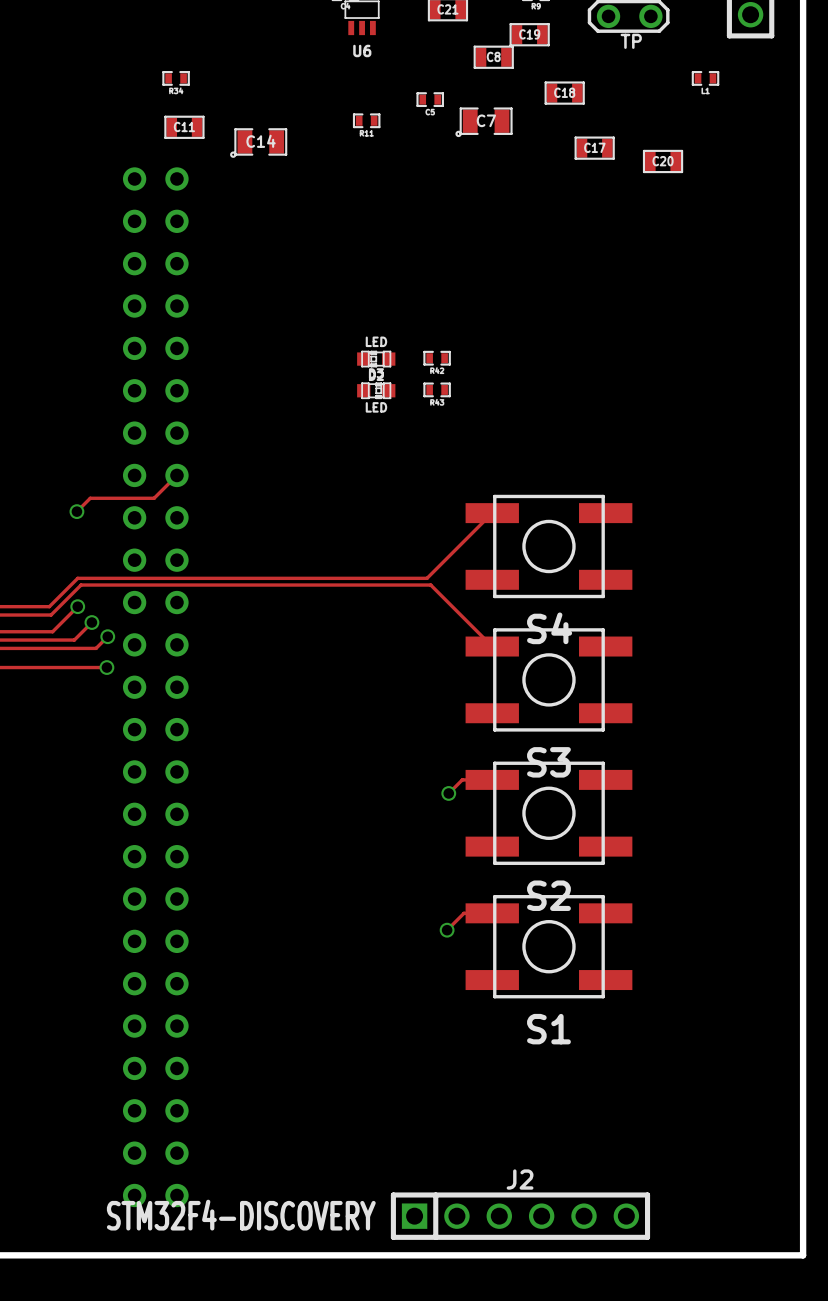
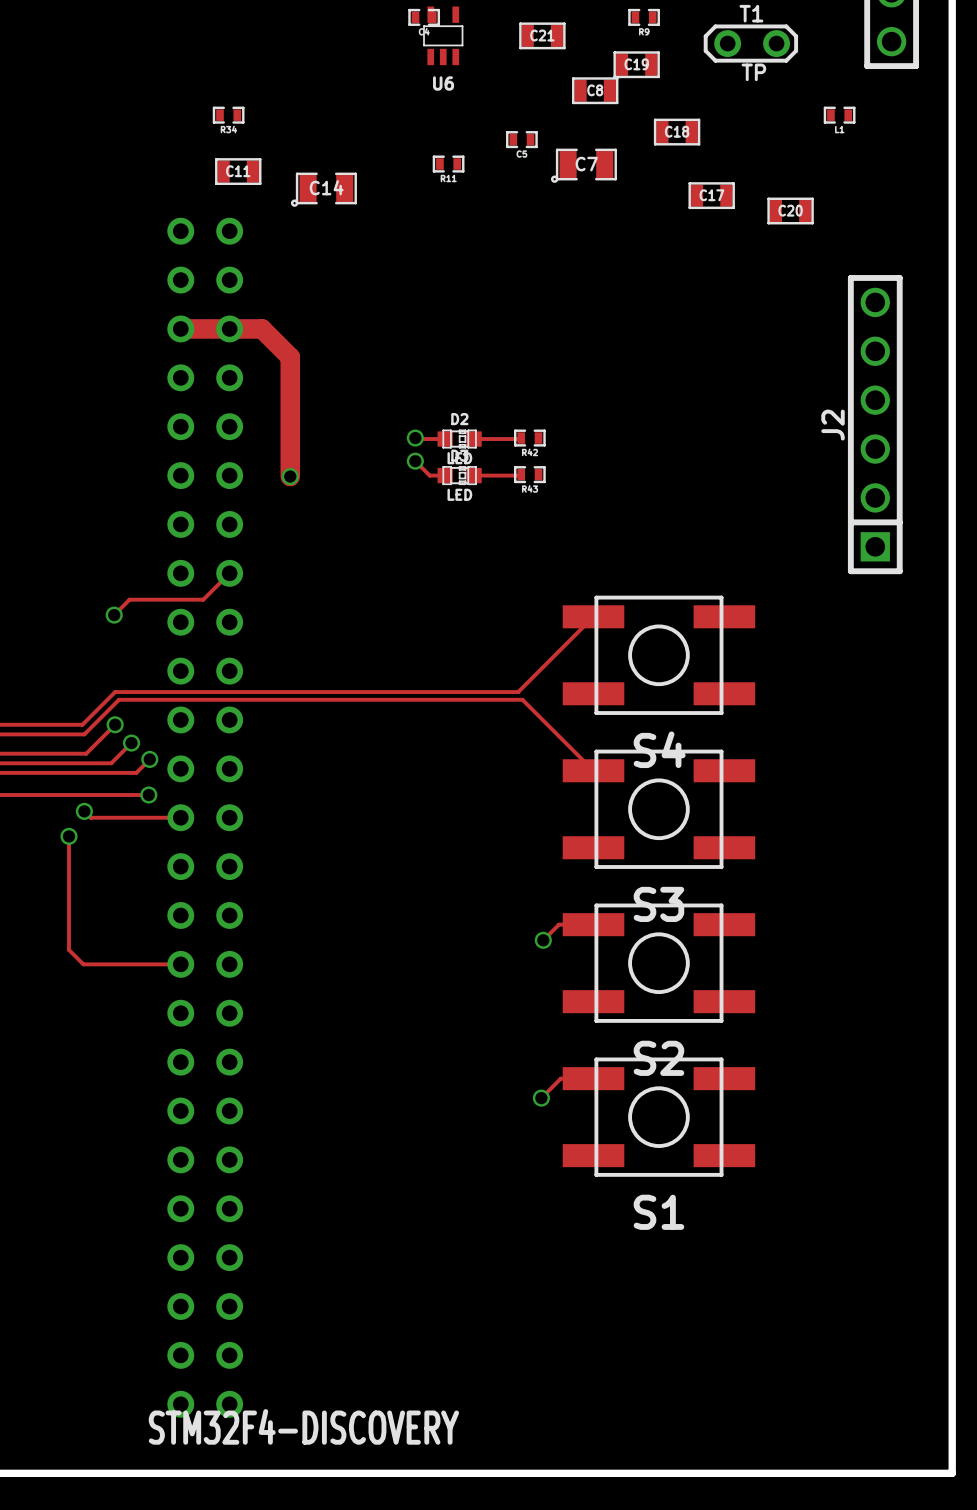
track: none -> (180, 328) (262, 328) (290, 357) (290, 476)
track: none -> (415, 438) (445, 439)
via: none -> (415, 438)
track: none -> (521, 438) (474, 439)
D2 rotation: 0° (376, 359) -> 180° (459, 439)
track: none -> (415, 461) (429, 475) (445, 475)
via: none -> (415, 461)
track: none -> (521, 474) (474, 475)
via: none -> (290, 476)
track: none -> (84, 811) (90, 817) (180, 817)
via: none -> (84, 811)
track: none -> (69, 836) (69, 949) (83, 964) (180, 964)
via: none -> (69, 836)
J2 rotation: 0° (520, 1216) -> 90° counterclockwise (875, 424)
J2 position: (520, 1216) -> (875, 424)

